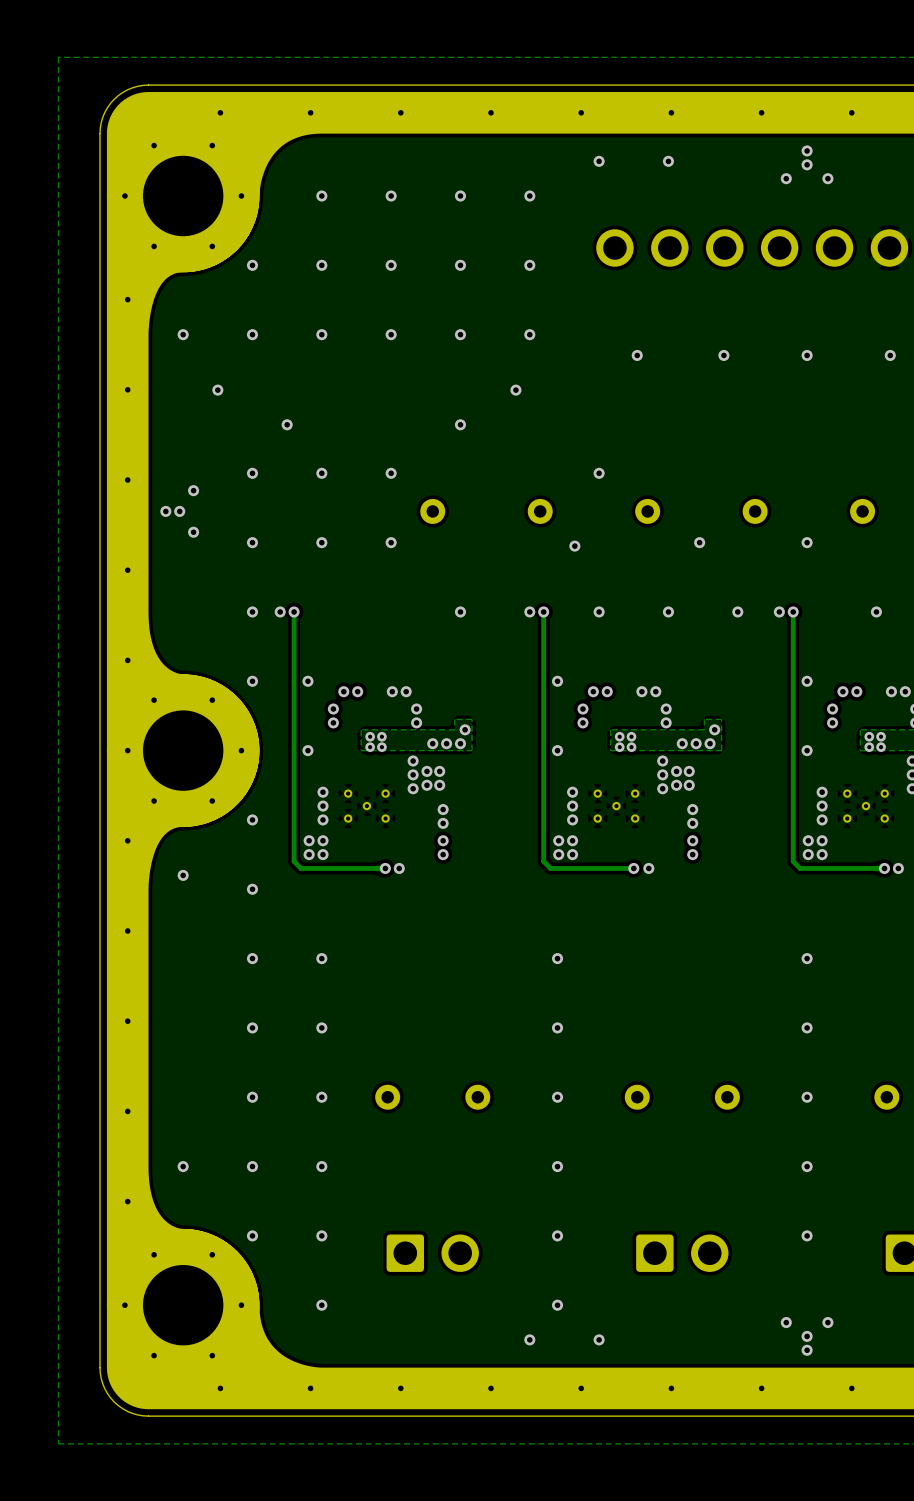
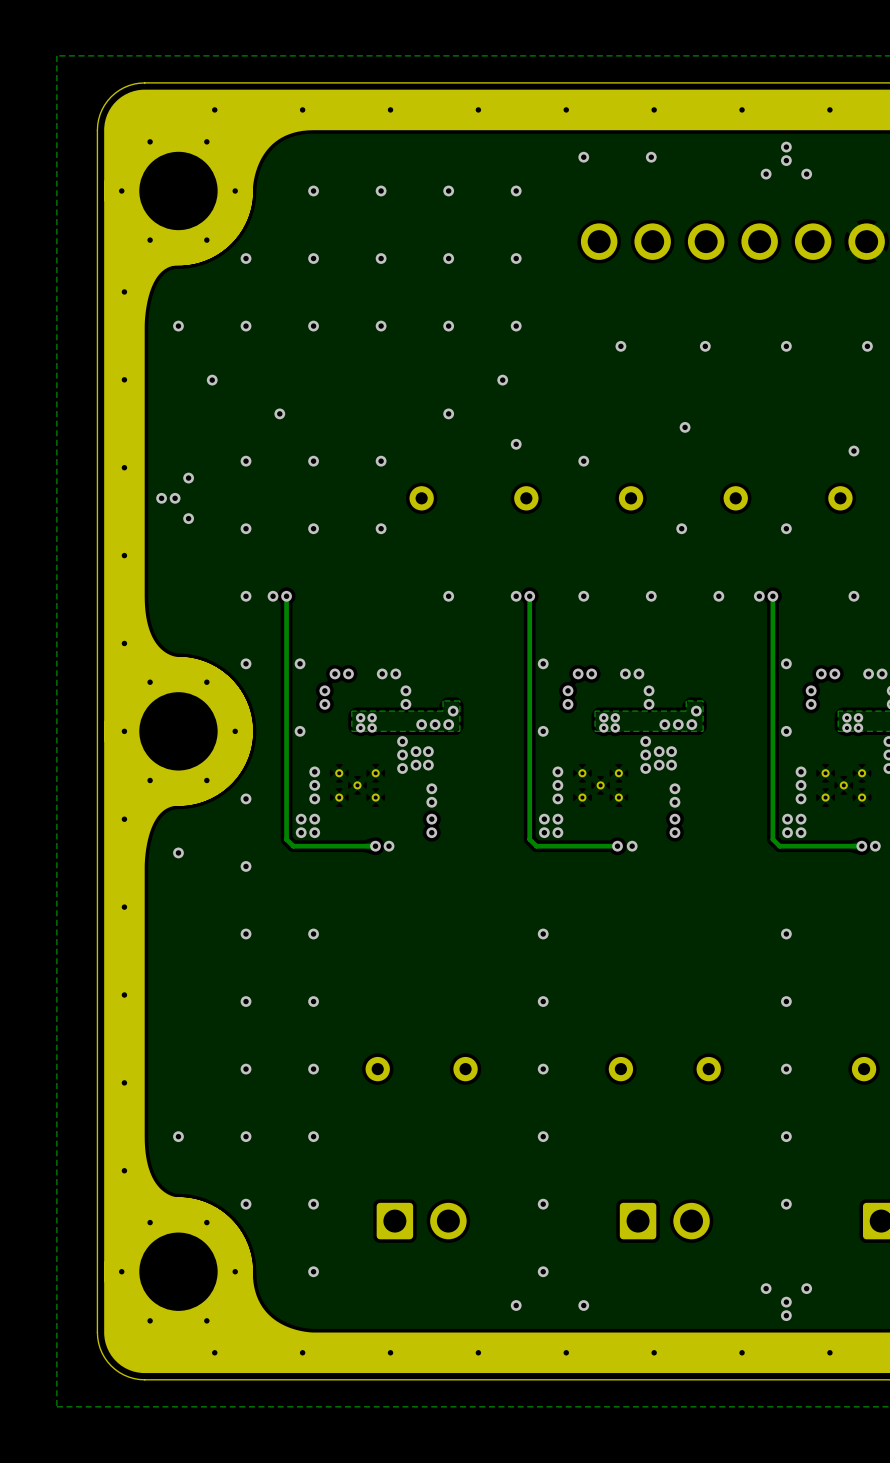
via: none -> (685, 427)
via: none -> (516, 444)
via: none -> (853, 451)
via: (574, 546) -> none

